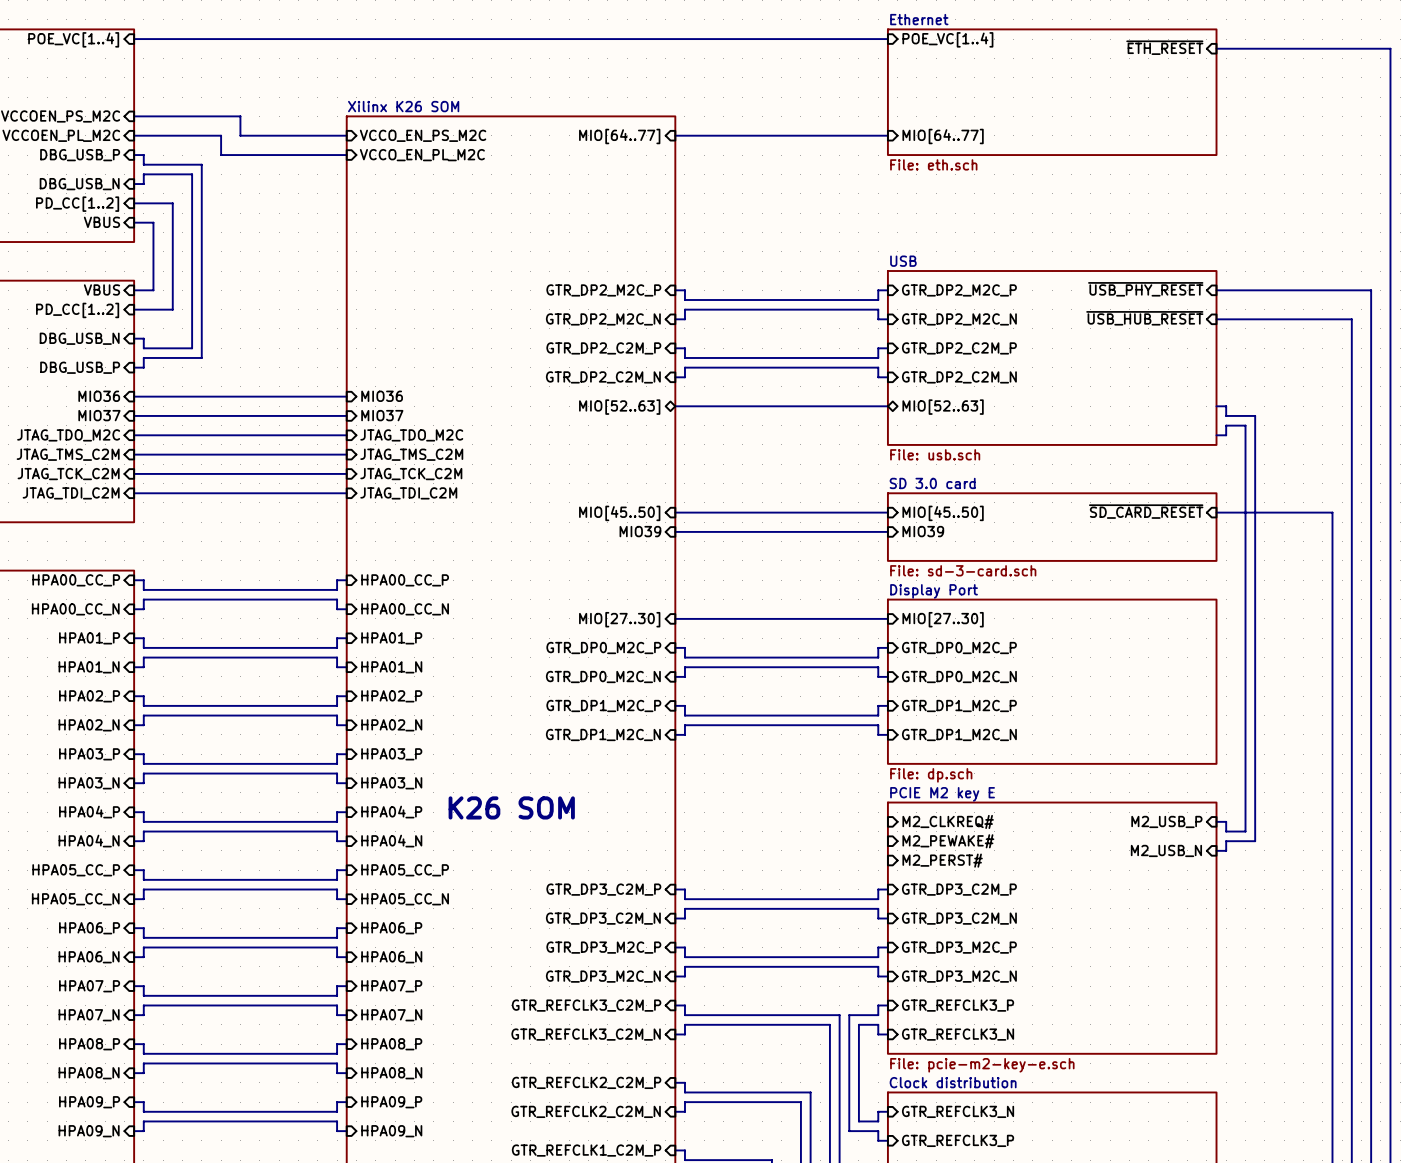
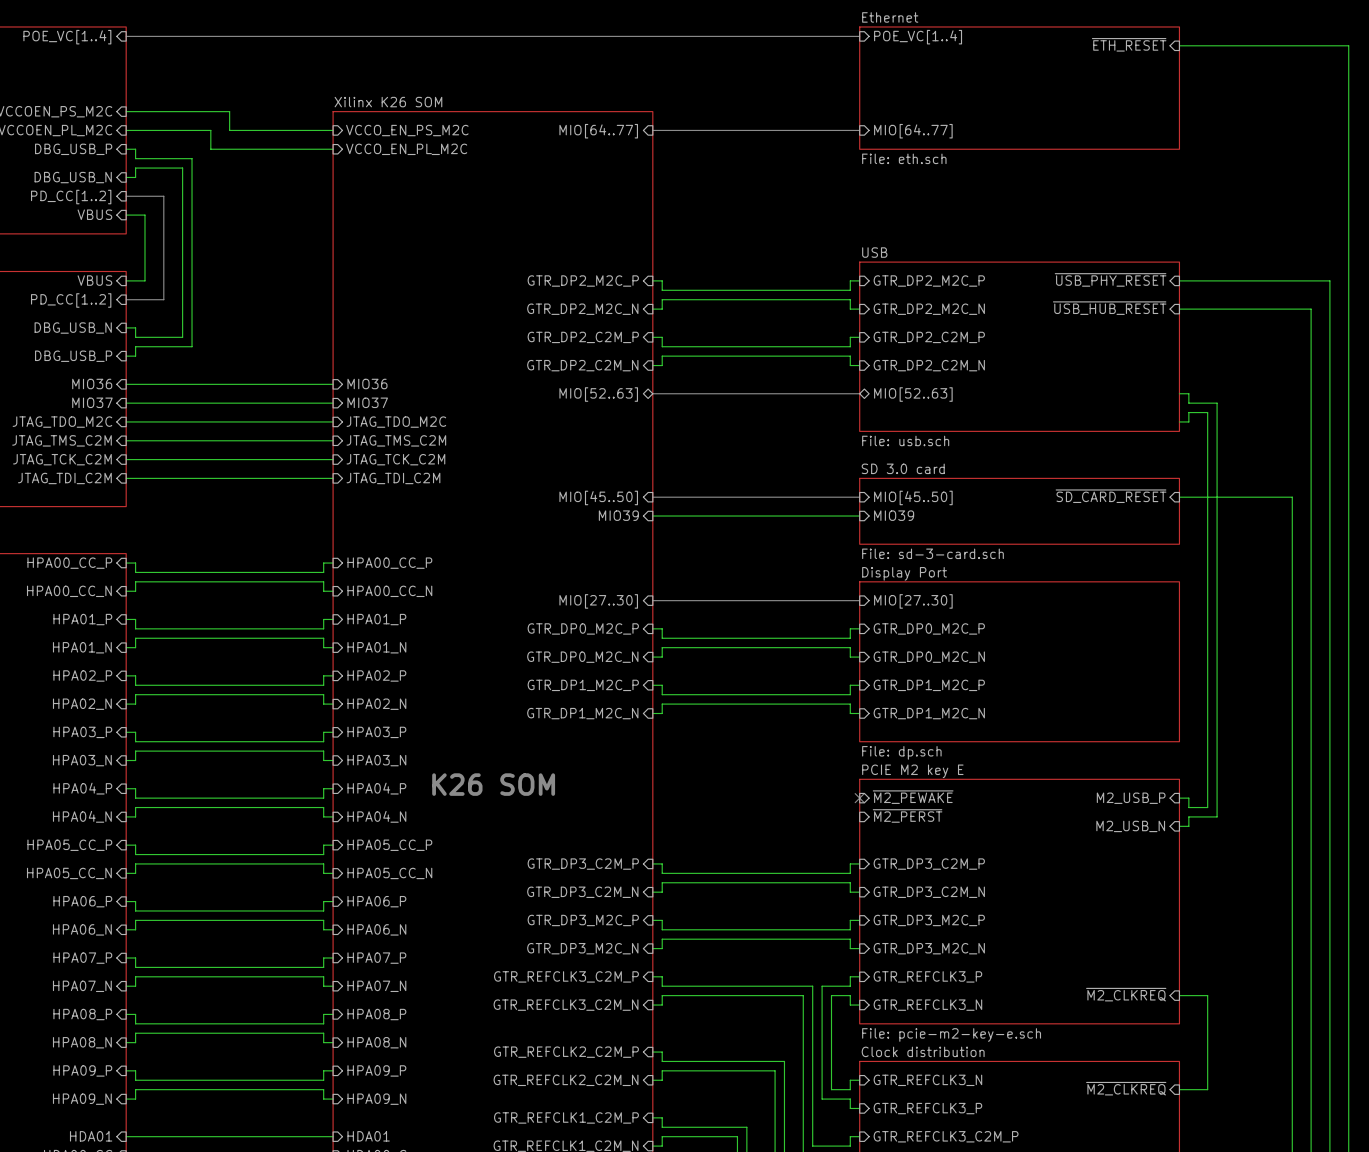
no-connect mark: none -> (859, 798)
sheet pin: M2_CLKREQ# (948, 821) -> ~{M2_PEWAKE} (913, 797)
sheet pin: M2_PEWAKE# (948, 841) -> ~{M2_PERST} (907, 815)
sheet pin: M2_PERST# (942, 860) -> none
sheet pin: none -> ~{M2_CLKREQ} (1126, 994)
wire: none -> (1179, 995) (1207, 995) (1207, 1089) (1179, 1089)
sheet pin: none -> ~{M2_CLKREQ} (1126, 1088)

